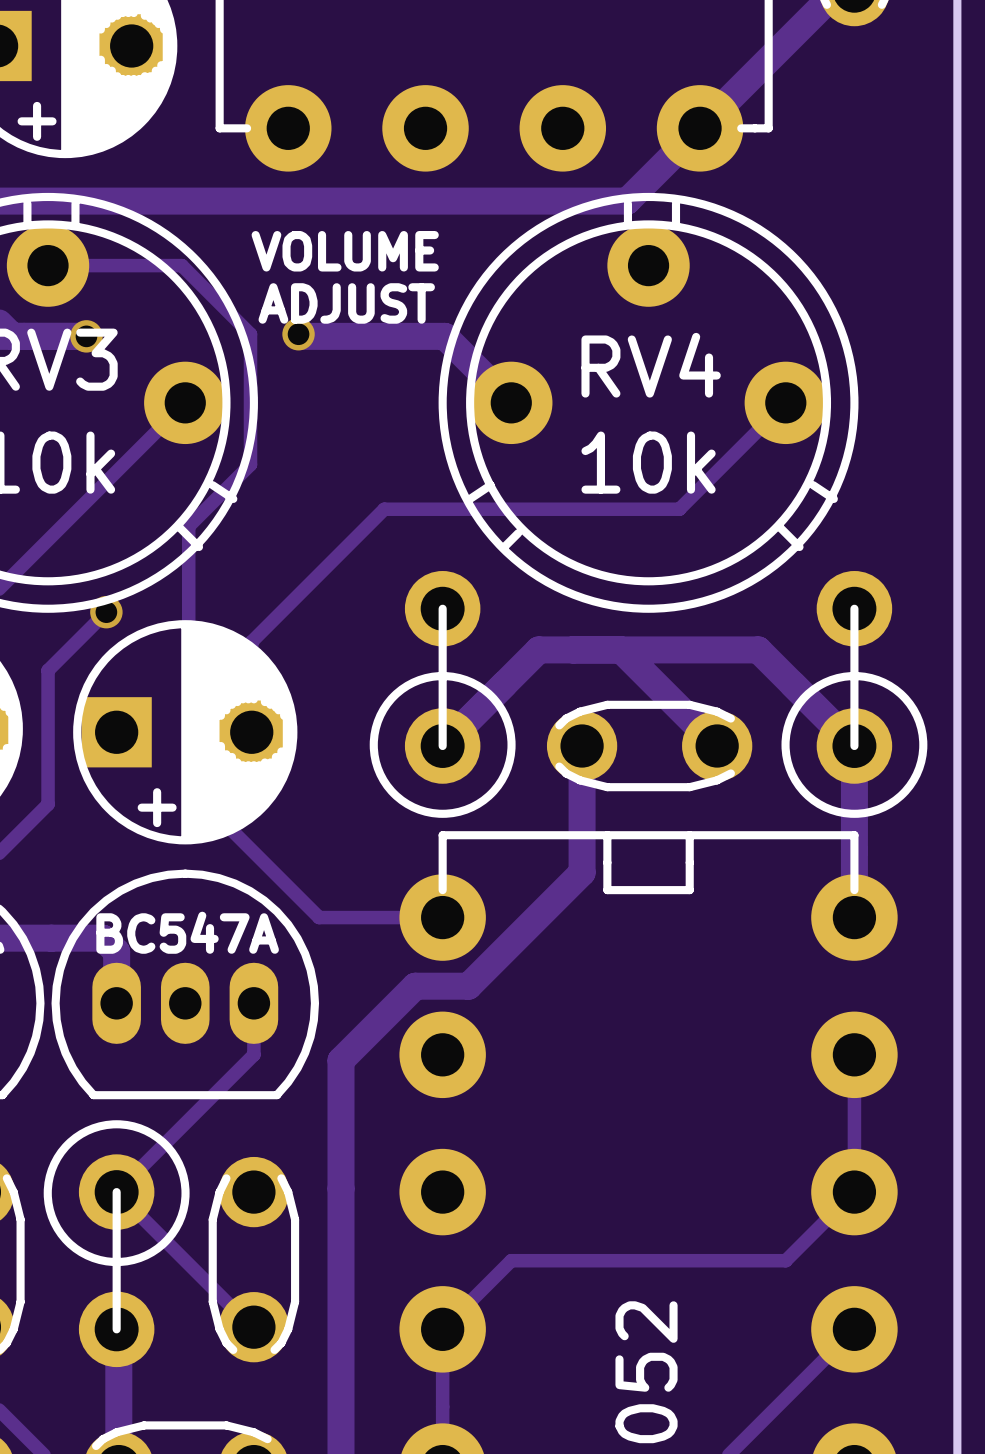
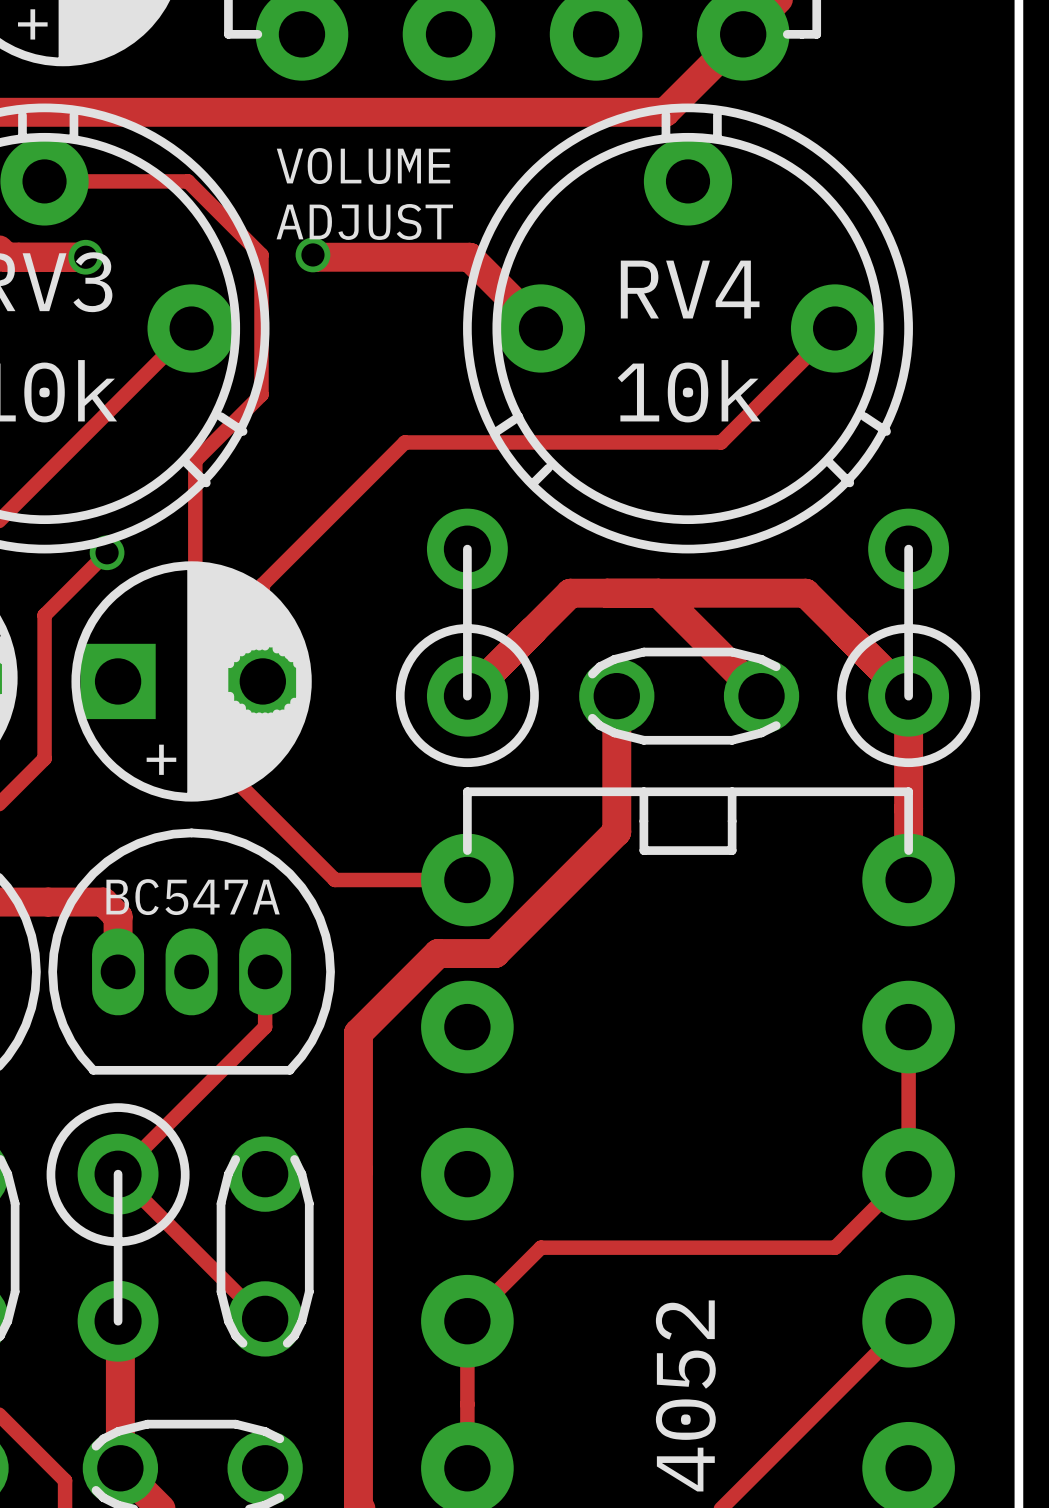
part footprint: [369, 571, 516, 818] -> [395, 508, 539, 768]
part footprint: [781, 571, 928, 818] -> [837, 508, 981, 768]
part footprint: [43, 1120, 190, 1368] -> [46, 1103, 190, 1362]

